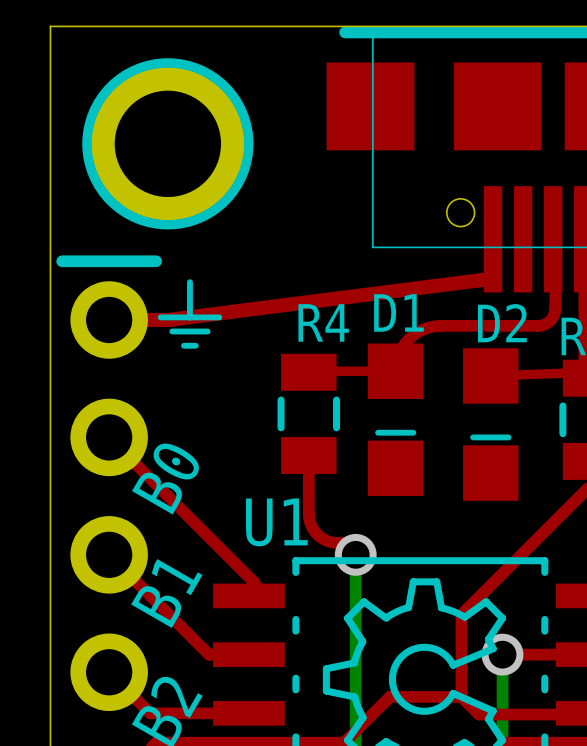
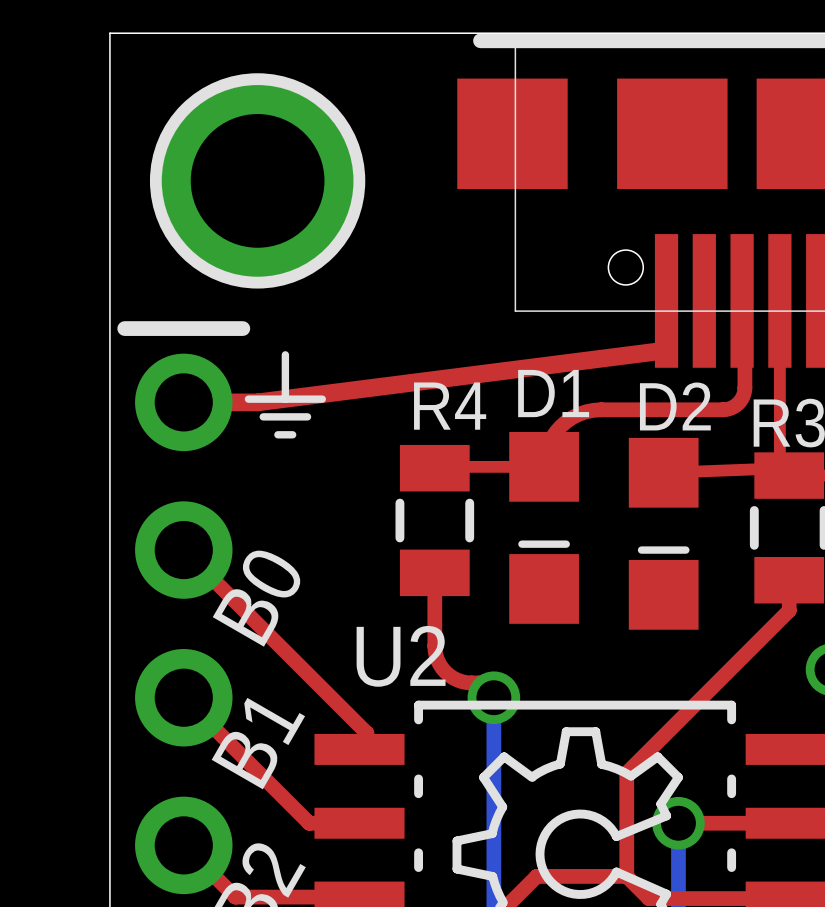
U1 name: U1 (276, 522) -> U2 (401, 656)

